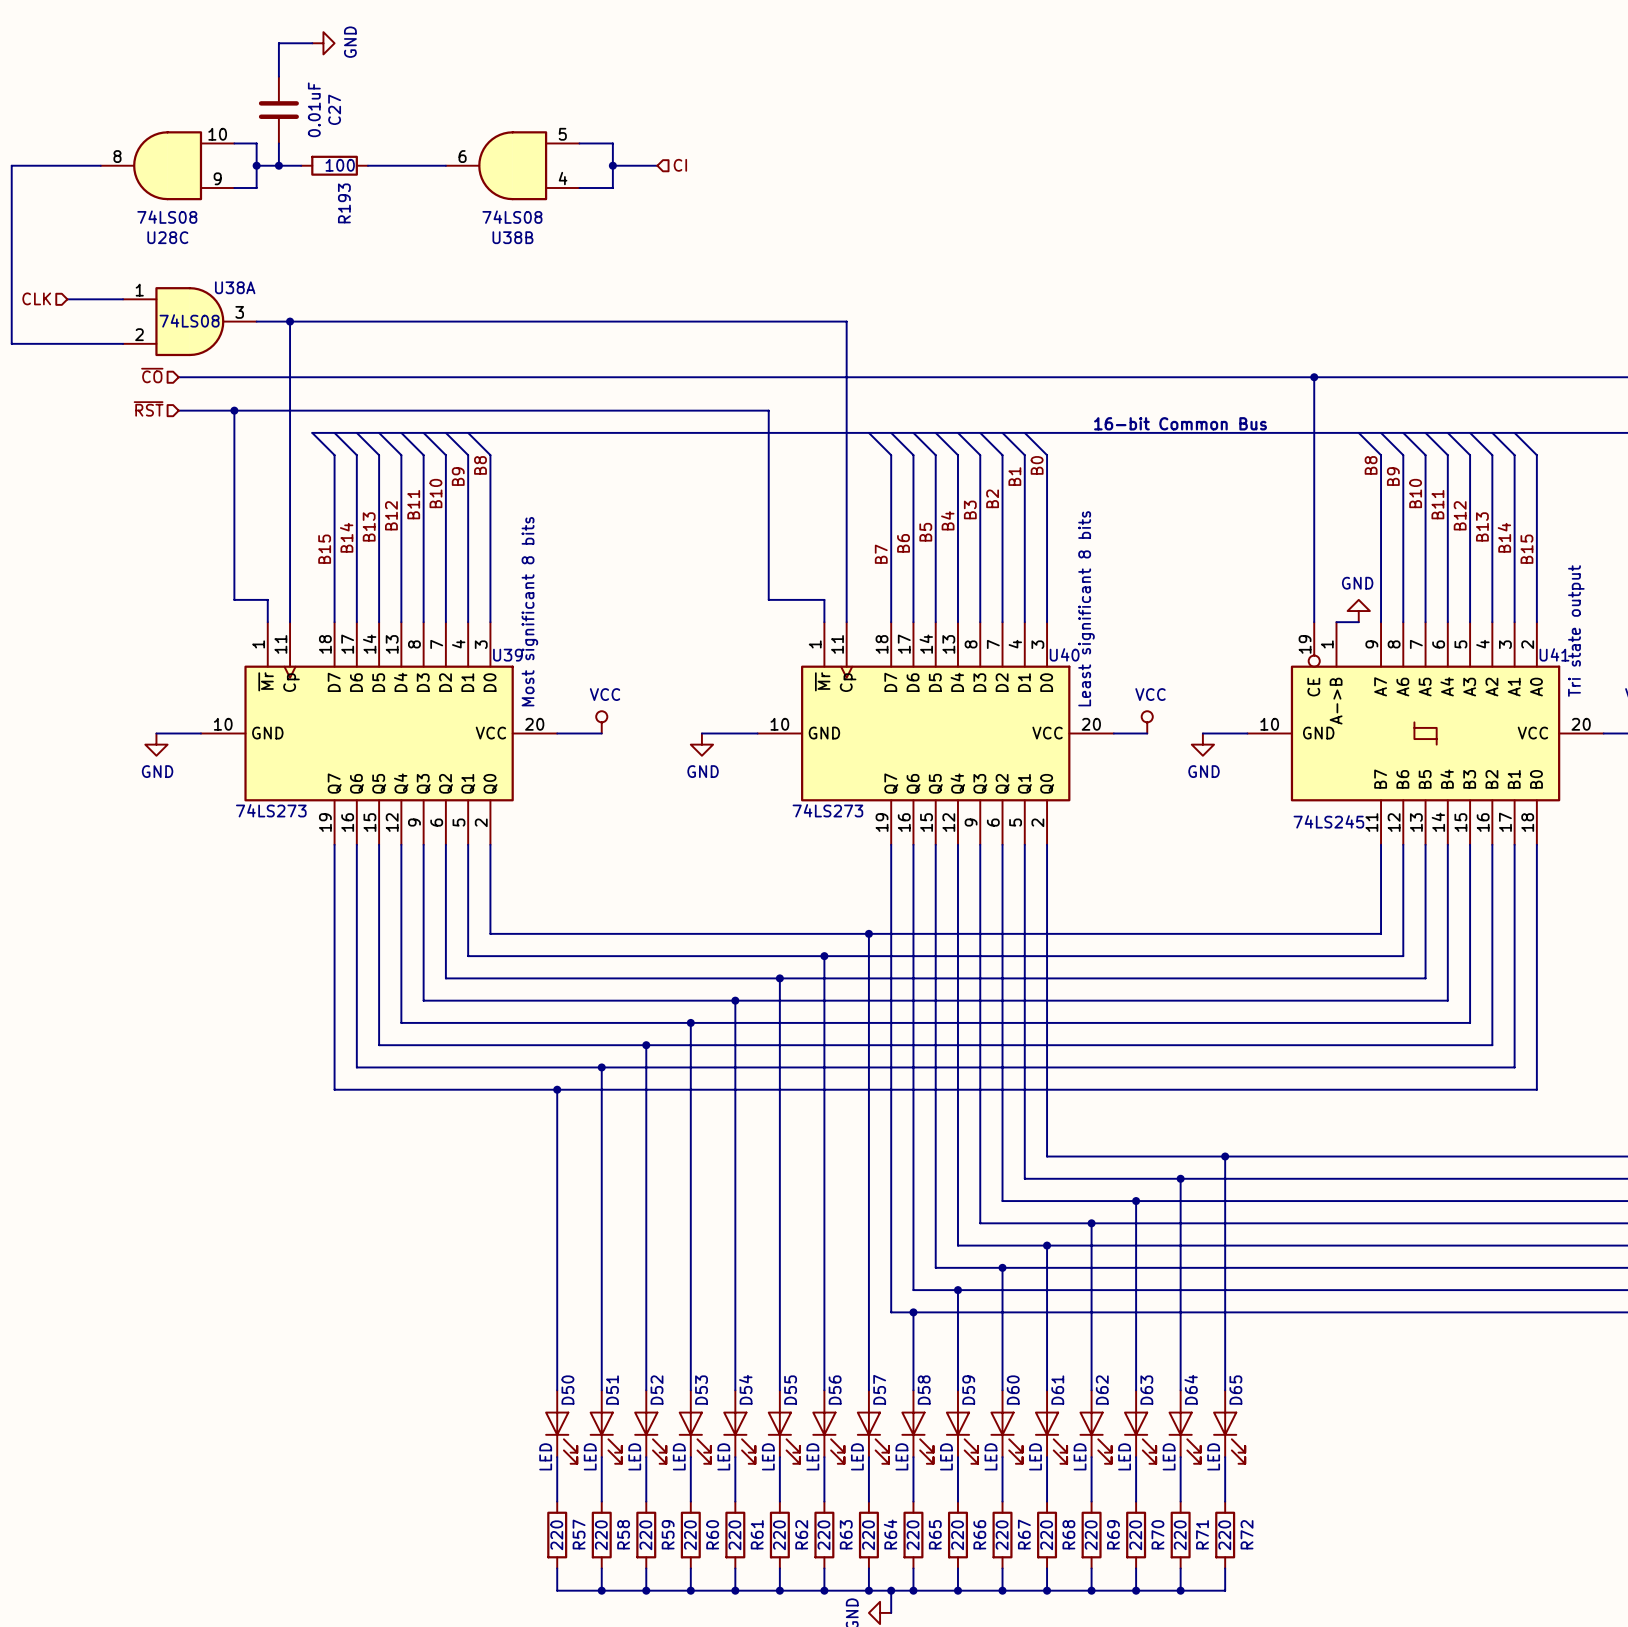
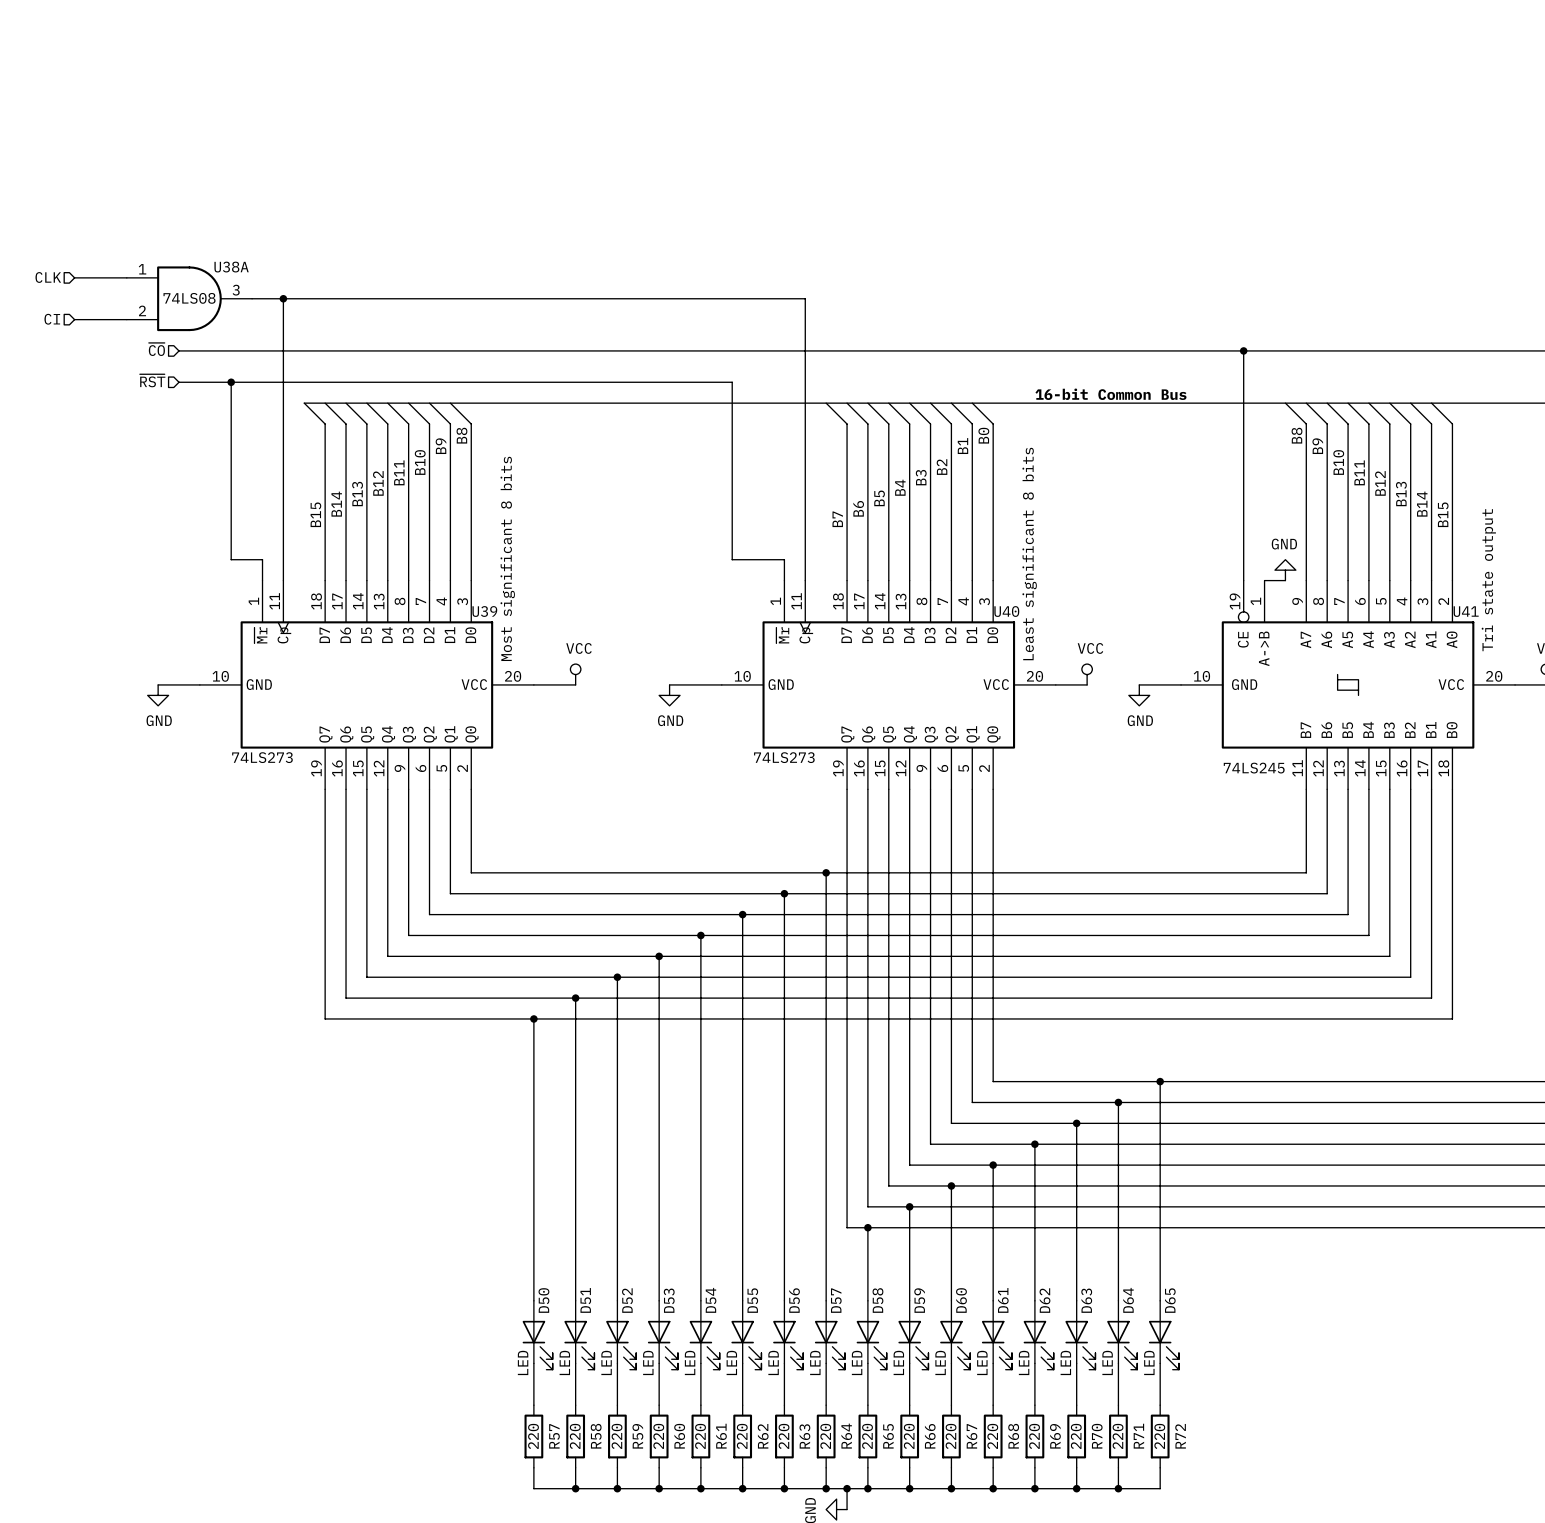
wire: (312, 43) (278, 43) (278, 76) -> none
power symbol: GND (323, 43) -> none
C27: 0.01uF (278, 110) -> none
wire: (234, 143) (256, 143) (256, 187) (234, 187) -> none
wire: (278, 143) (278, 165) -> none
wire: (579, 143) (612, 143) (612, 187) (579, 187) -> none
wire: (100, 165) (11, 165) (11, 343) (67, 343) -> none
U28C: 74LS08 (167, 165) -> none
wire: (256, 165) (301, 165) -> none
junction: (256, 165) -> none
junction: (278, 165) -> none
R193: 100 (334, 165) -> none
wire: (367, 165) (445, 165) -> none
U38B: 74LS08 (512, 165) -> none
wire: (612, 165) (657, 165) -> none
junction: (612, 165) -> none
hierarchical label: CI (680, 165) -> none
hierarchical label: none -> CI (52, 319)

